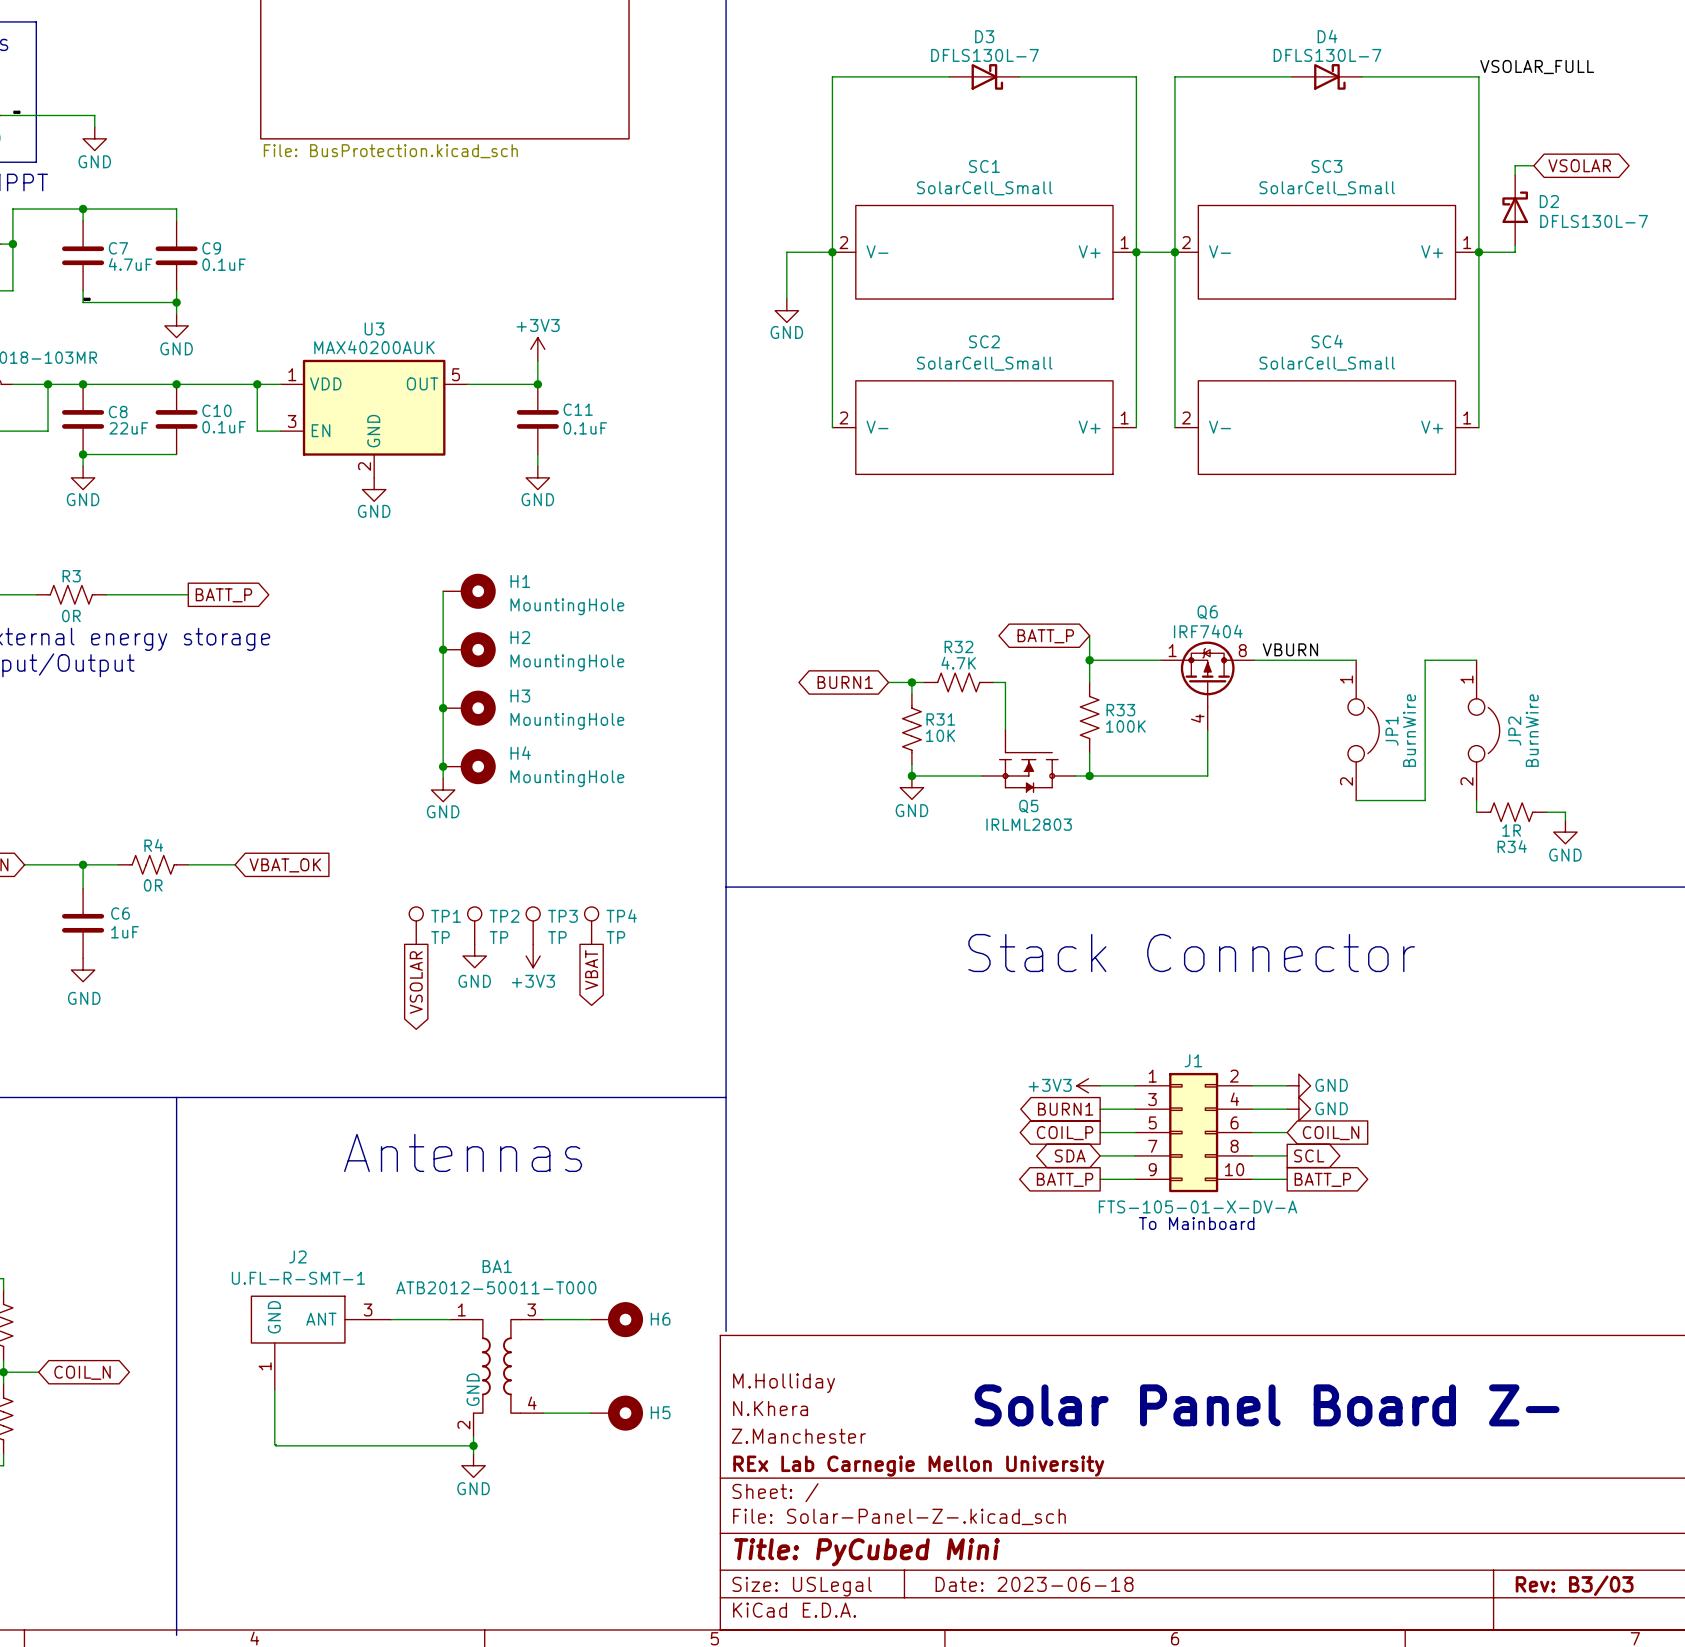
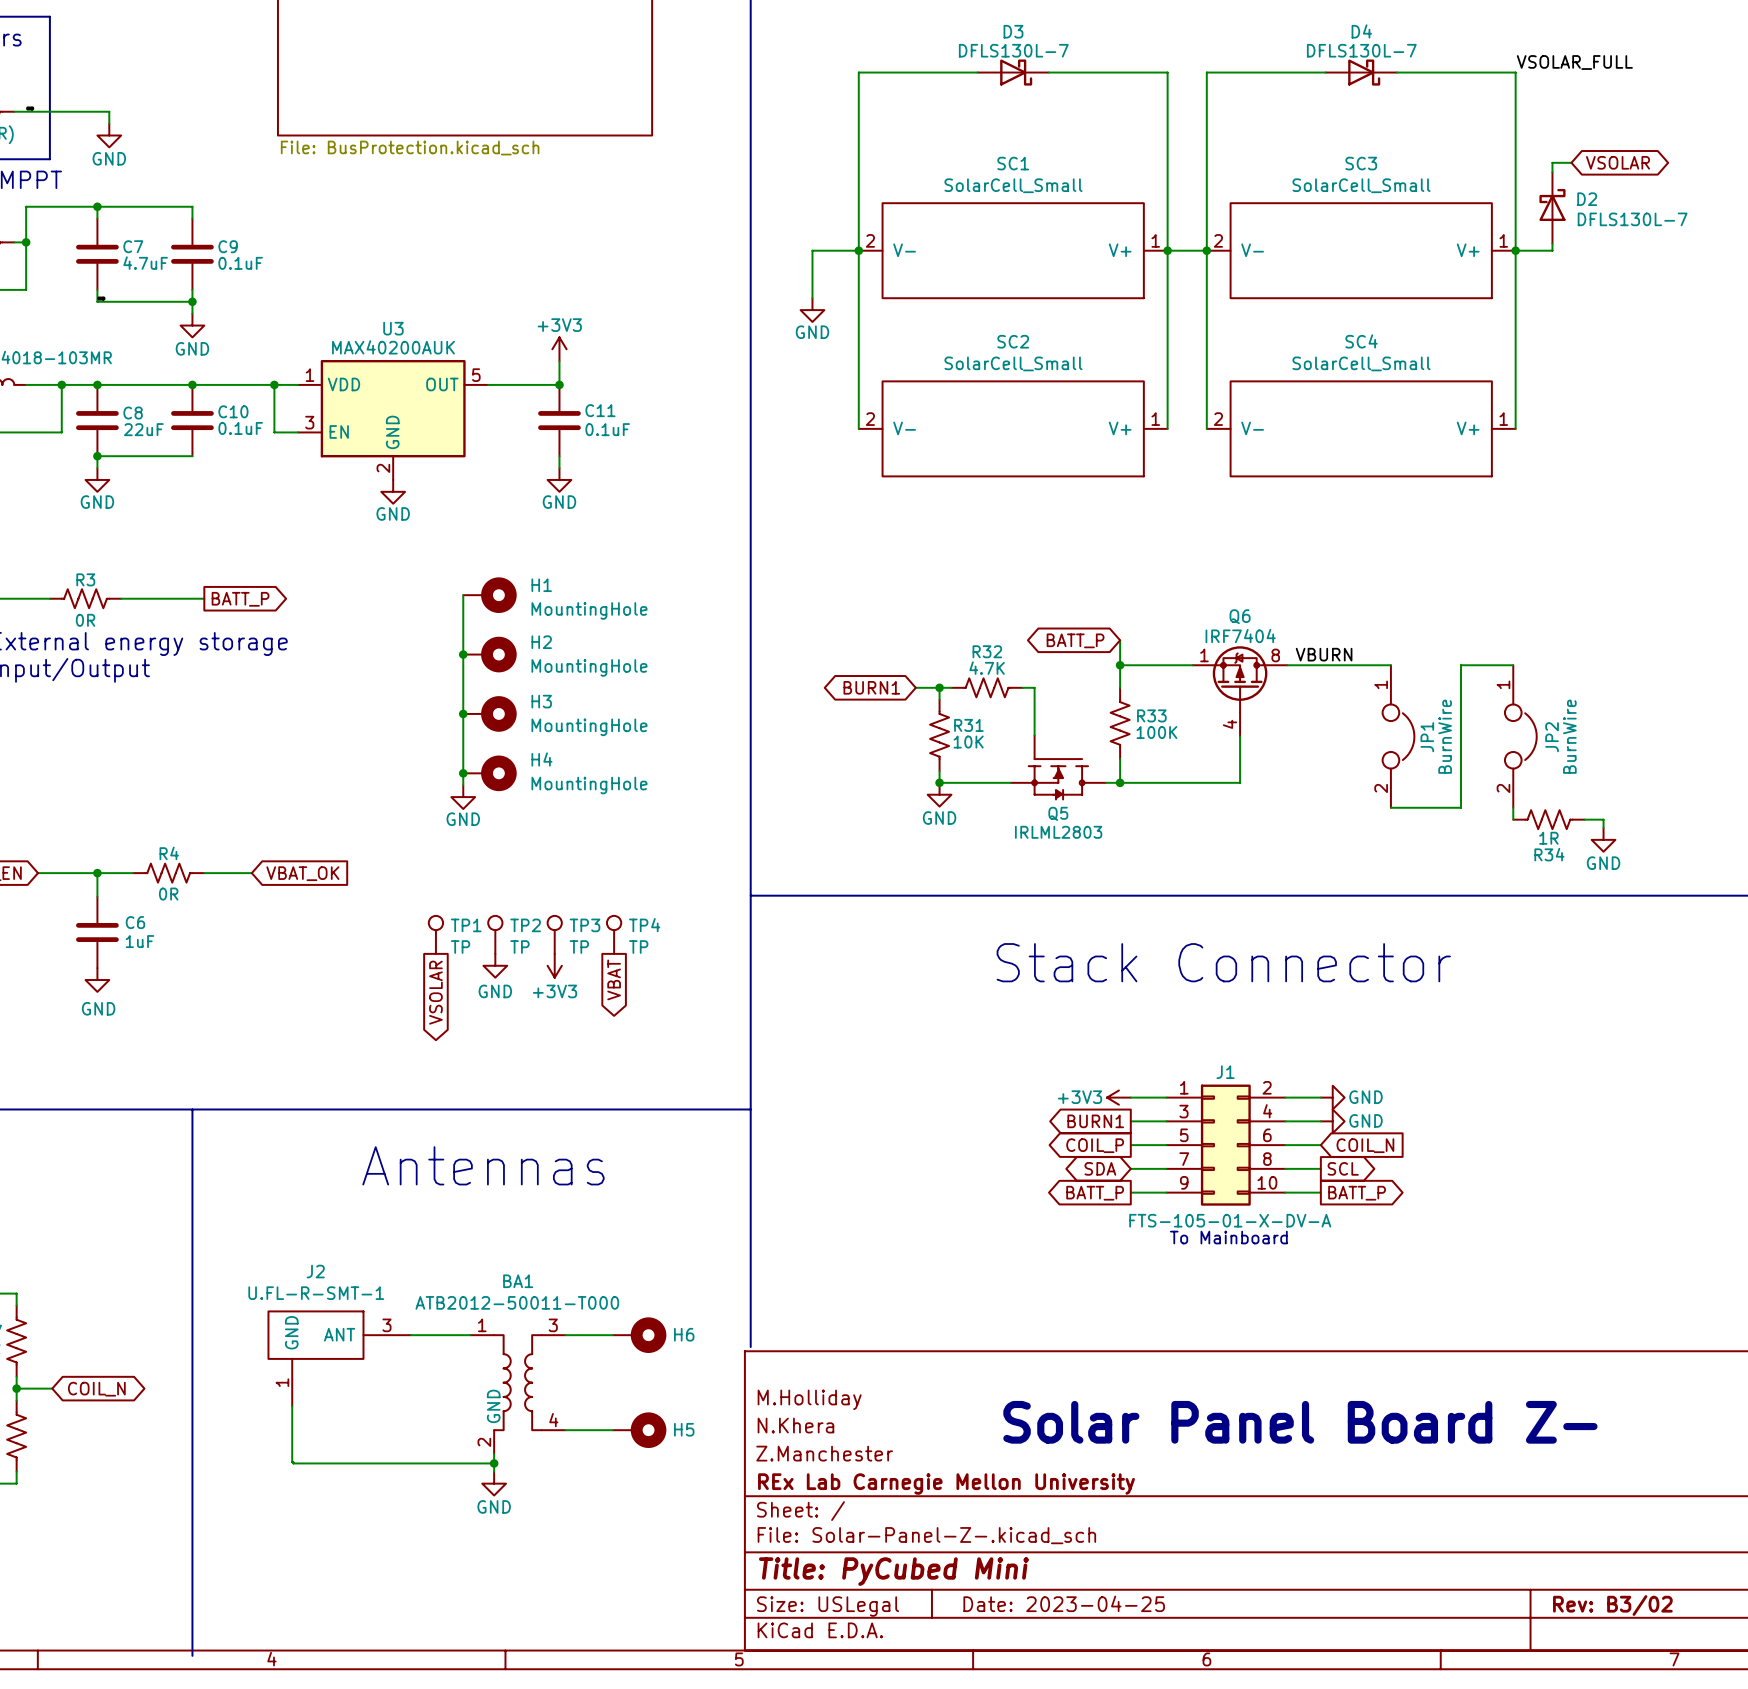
title block: Date: 2023-06-18 (1034, 1584) -> Date: 2023-04-25 (1064, 1603)
title block: Rev: B3/03 (1574, 1585) -> Rev: B3/02 (1612, 1605)

